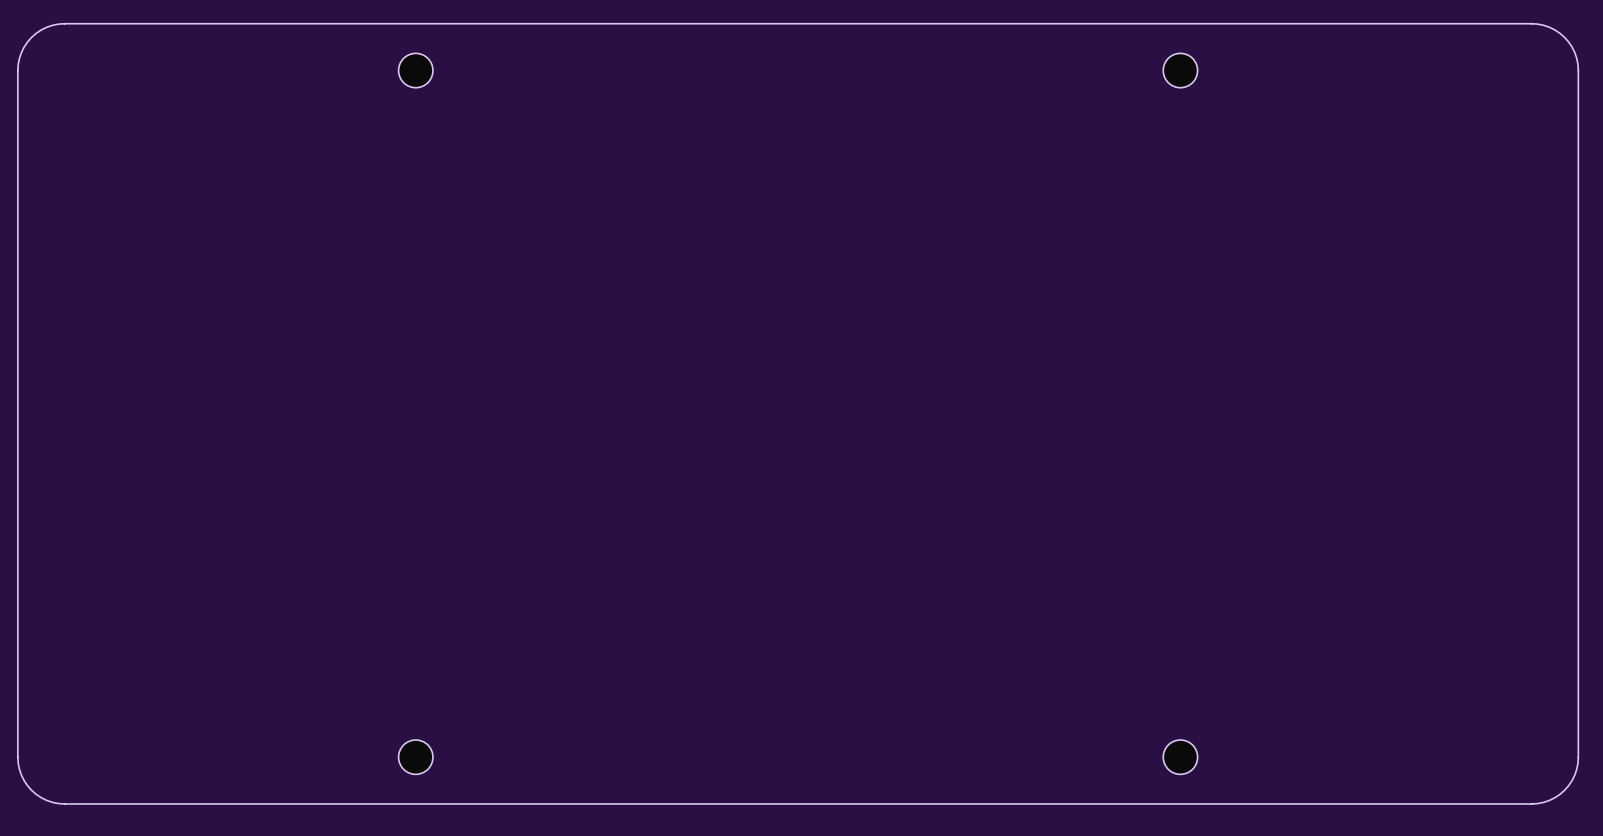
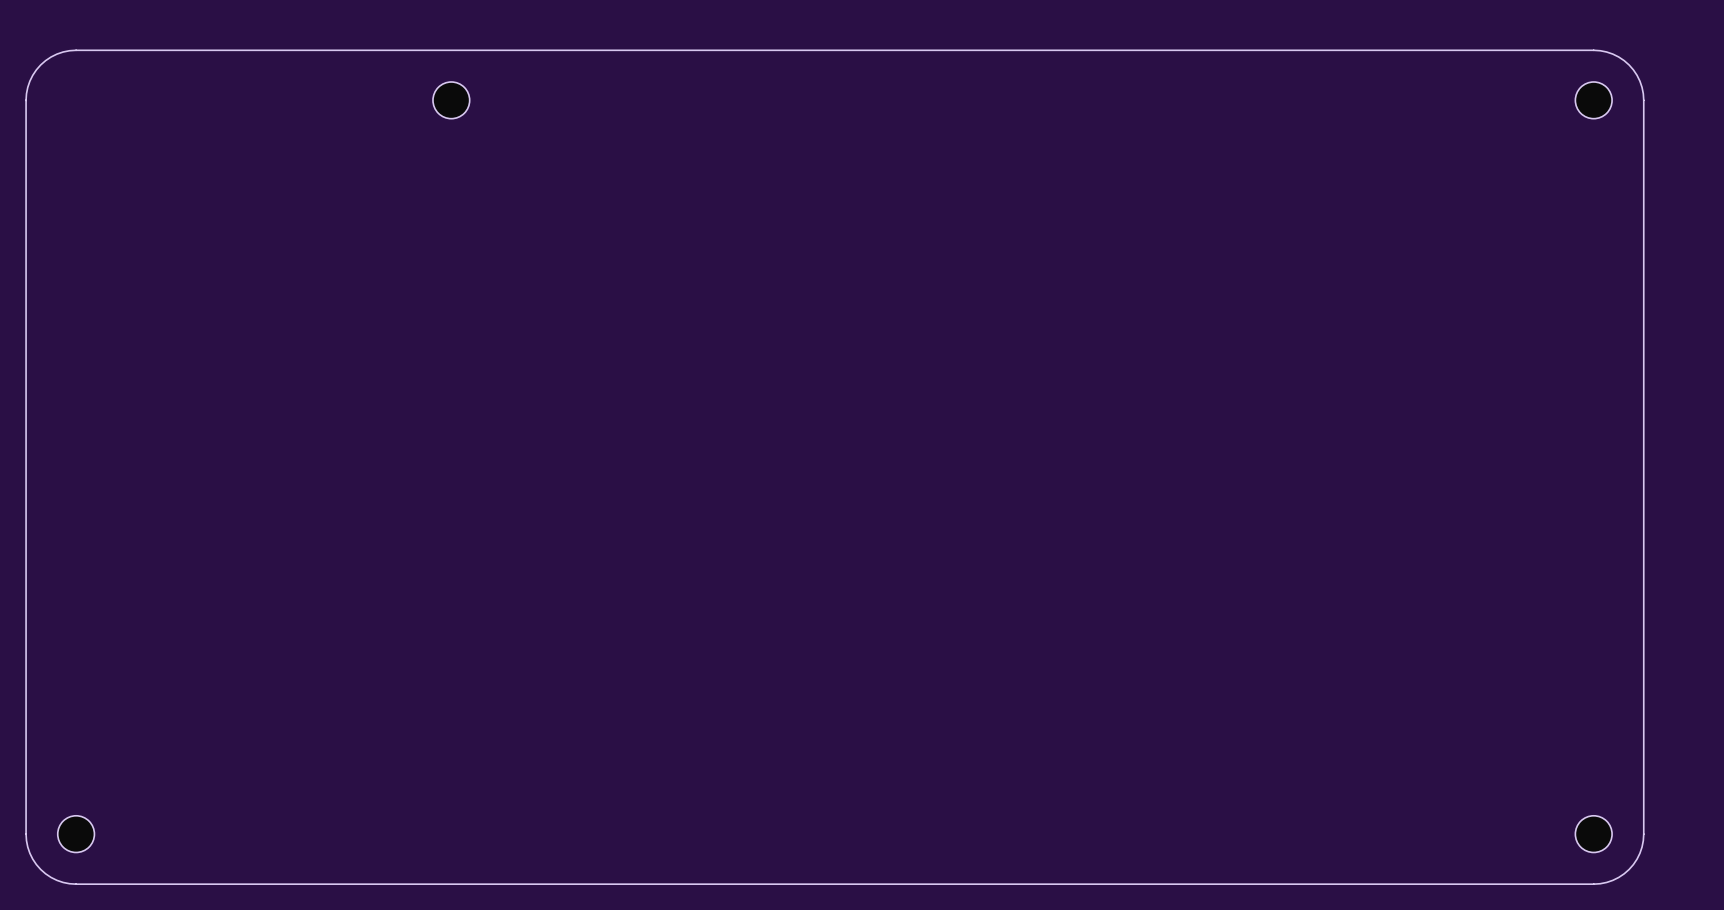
board edge: (1484, 23) (1537, 24) (1554, 30) (1564, 37) (1572, 47) (1576, 58) (1578, 70) (1577, 763) (1574, 775) (1568, 785) (1560, 794) (1549, 800) (1531, 803) (1484, 803) -> (1593, 50) (1612, 54) (1629, 64) (1639, 81) (1643, 100) (1643, 834) (1639, 853) (1629, 869) (1612, 880) (1593, 884)
part position: (1180, 70) -> (1593, 100)
part position: (415, 757) -> (76, 834)
part position: (1180, 757) -> (1593, 834)

